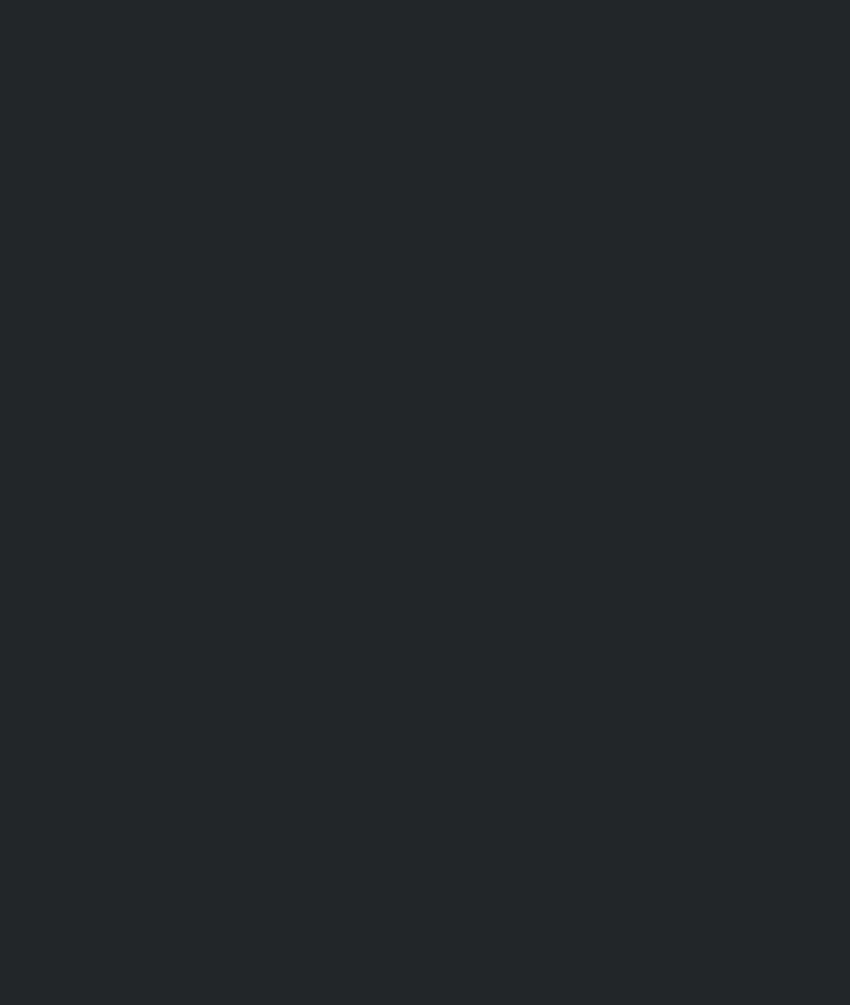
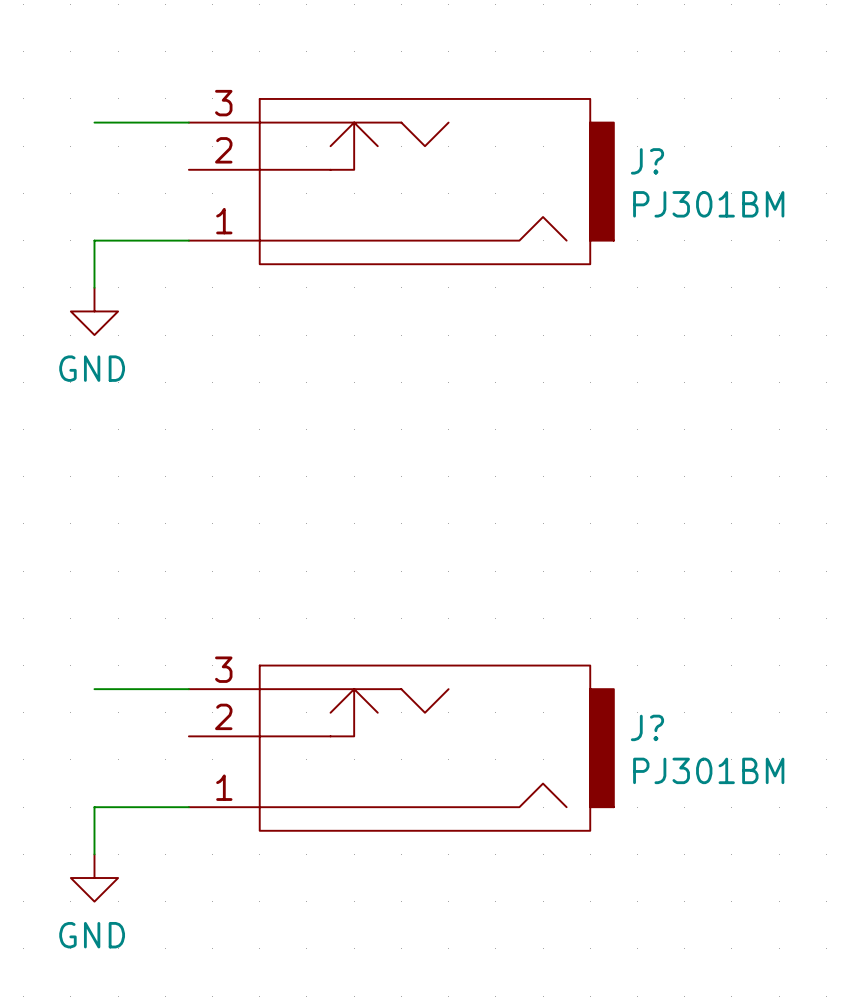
wire: none -> (94, 122) (188, 122)
J?: none -> PJ301BM (401, 181)
wire: none -> (188, 240) (94, 240) (94, 287)
power symbol: none -> GND (94, 311)
wire: none -> (94, 689) (188, 689)
J?: none -> PJ301BM (401, 748)
wire: none -> (188, 807) (94, 807) (94, 854)
power symbol: none -> GND (94, 878)

